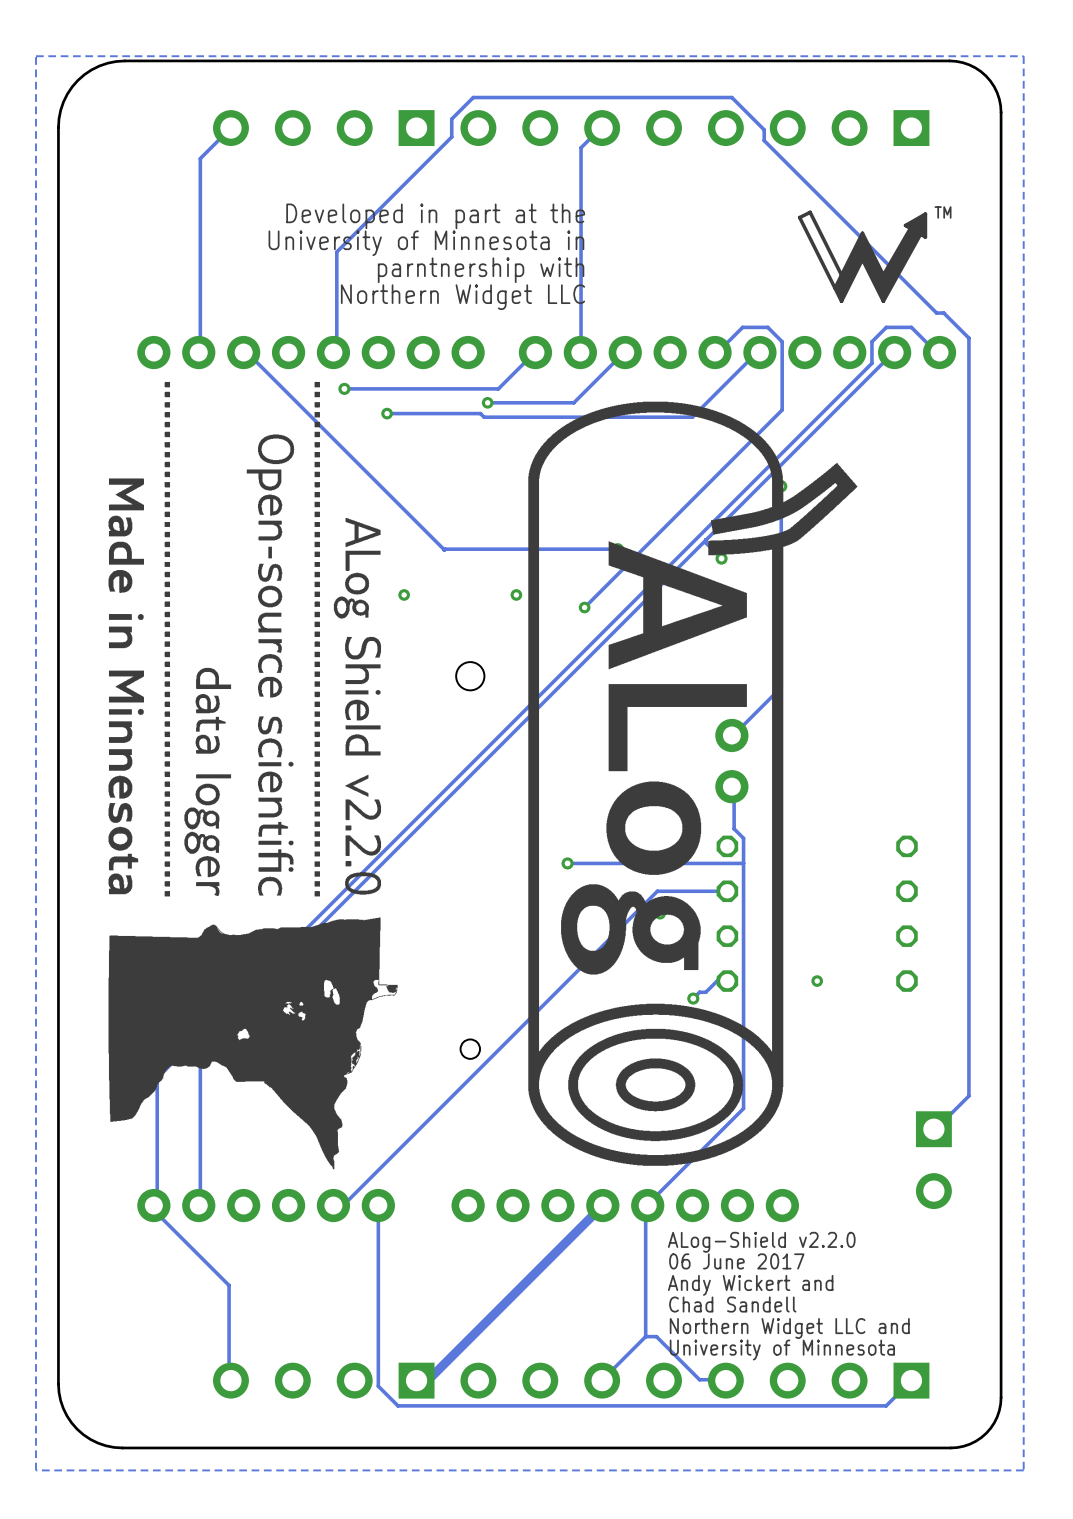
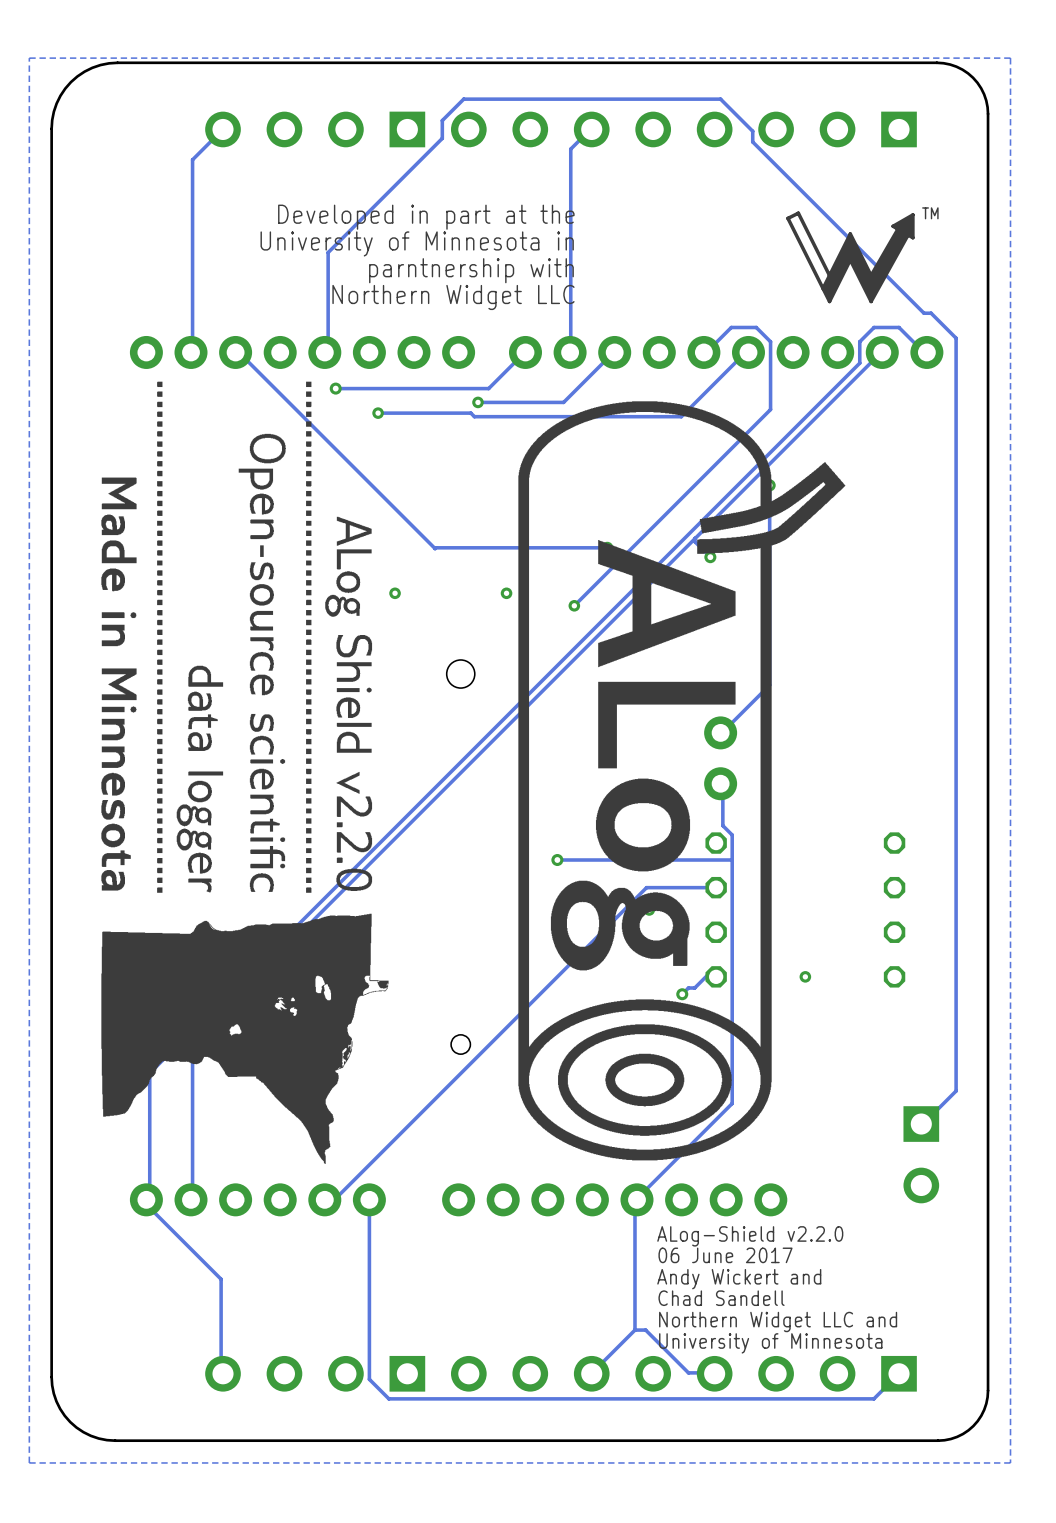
track: (602, 1205) (427, 1380) -> none

